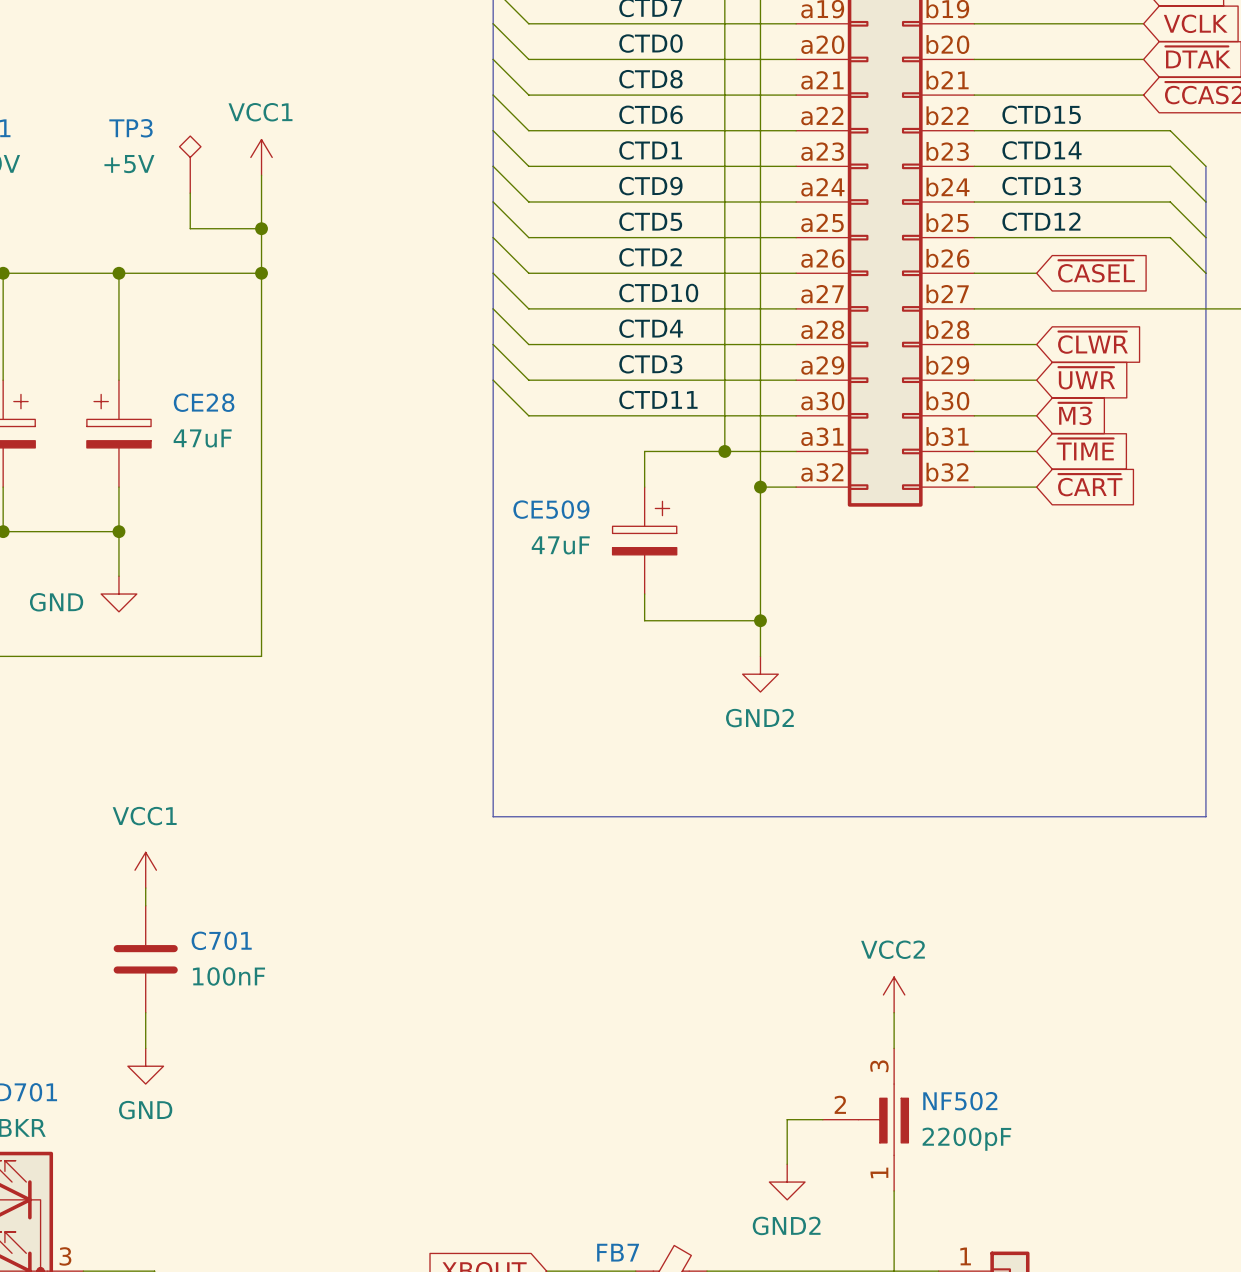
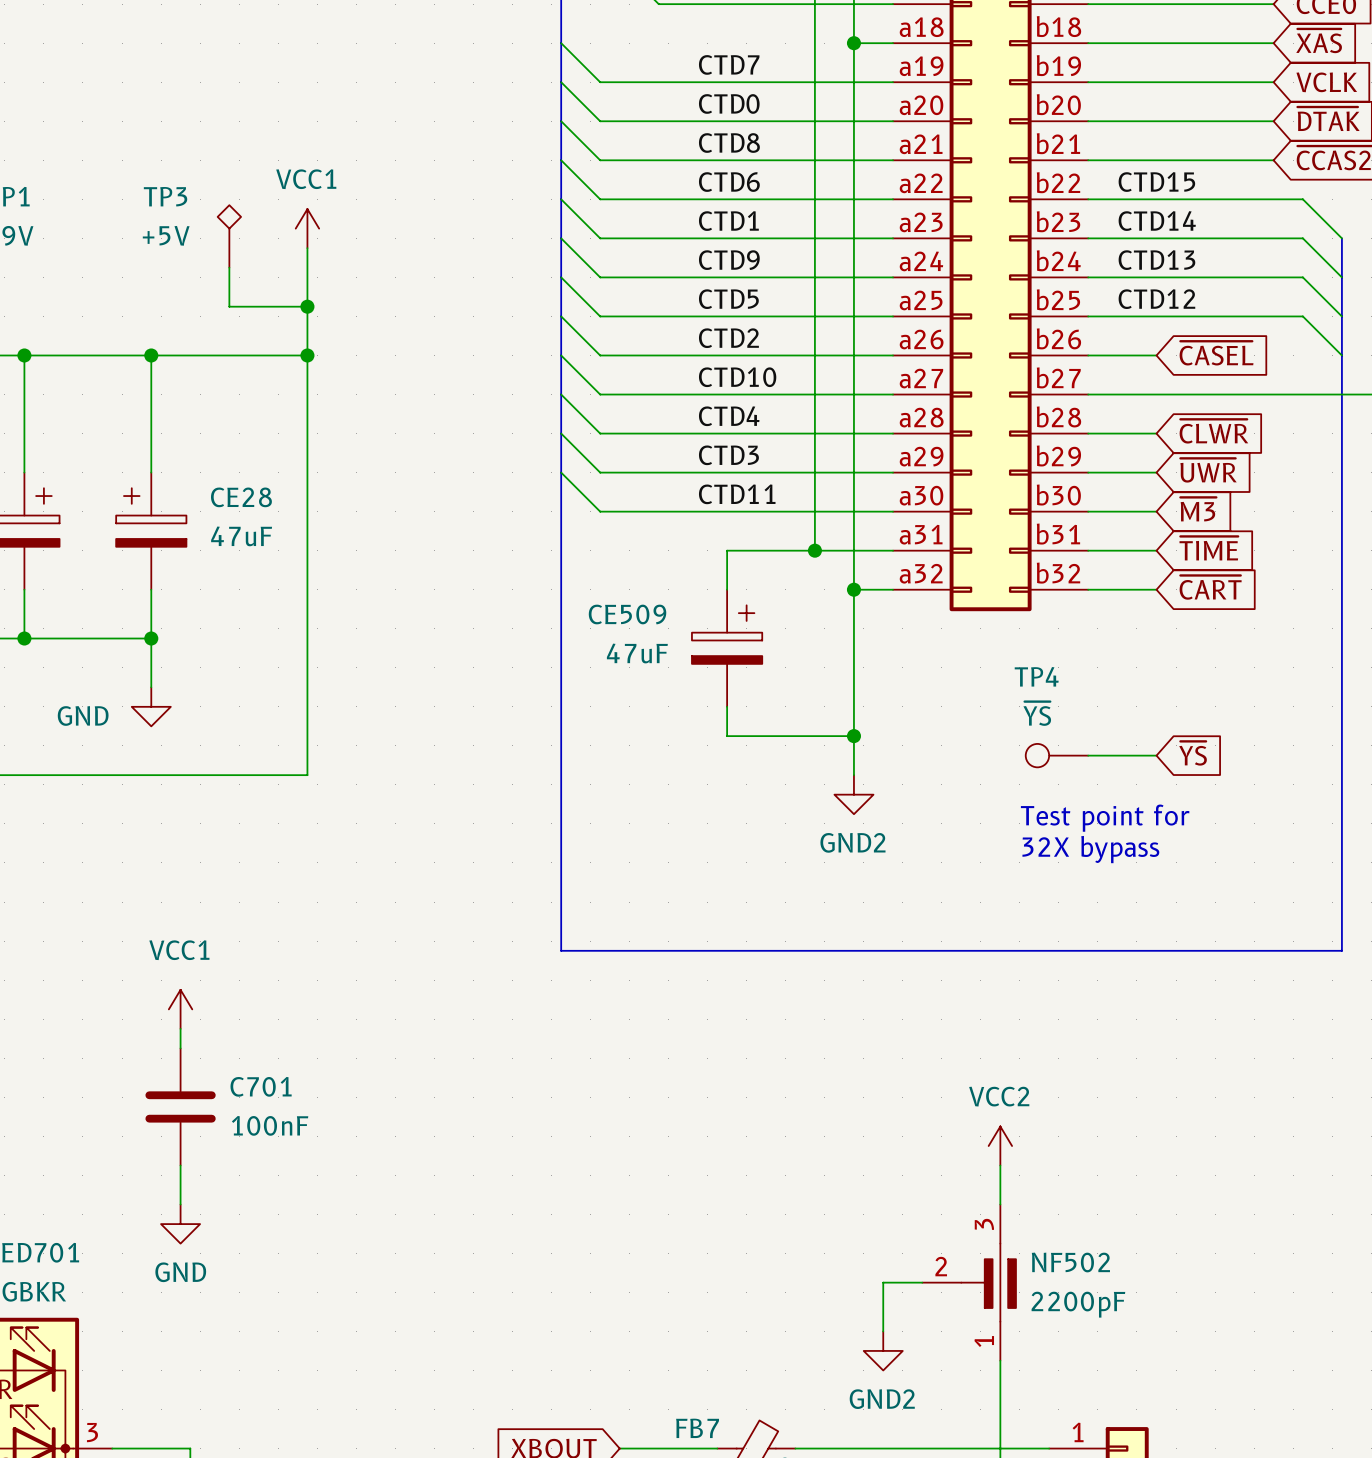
global label: none -> ~{YS} (1193, 753)
TP4: none -> ~{YS} (1056, 755)
wire: none -> (1088, 755) (1156, 755)
text: none -> Test point for (1105, 818)
text: none -> 32X bypass (1090, 849)

